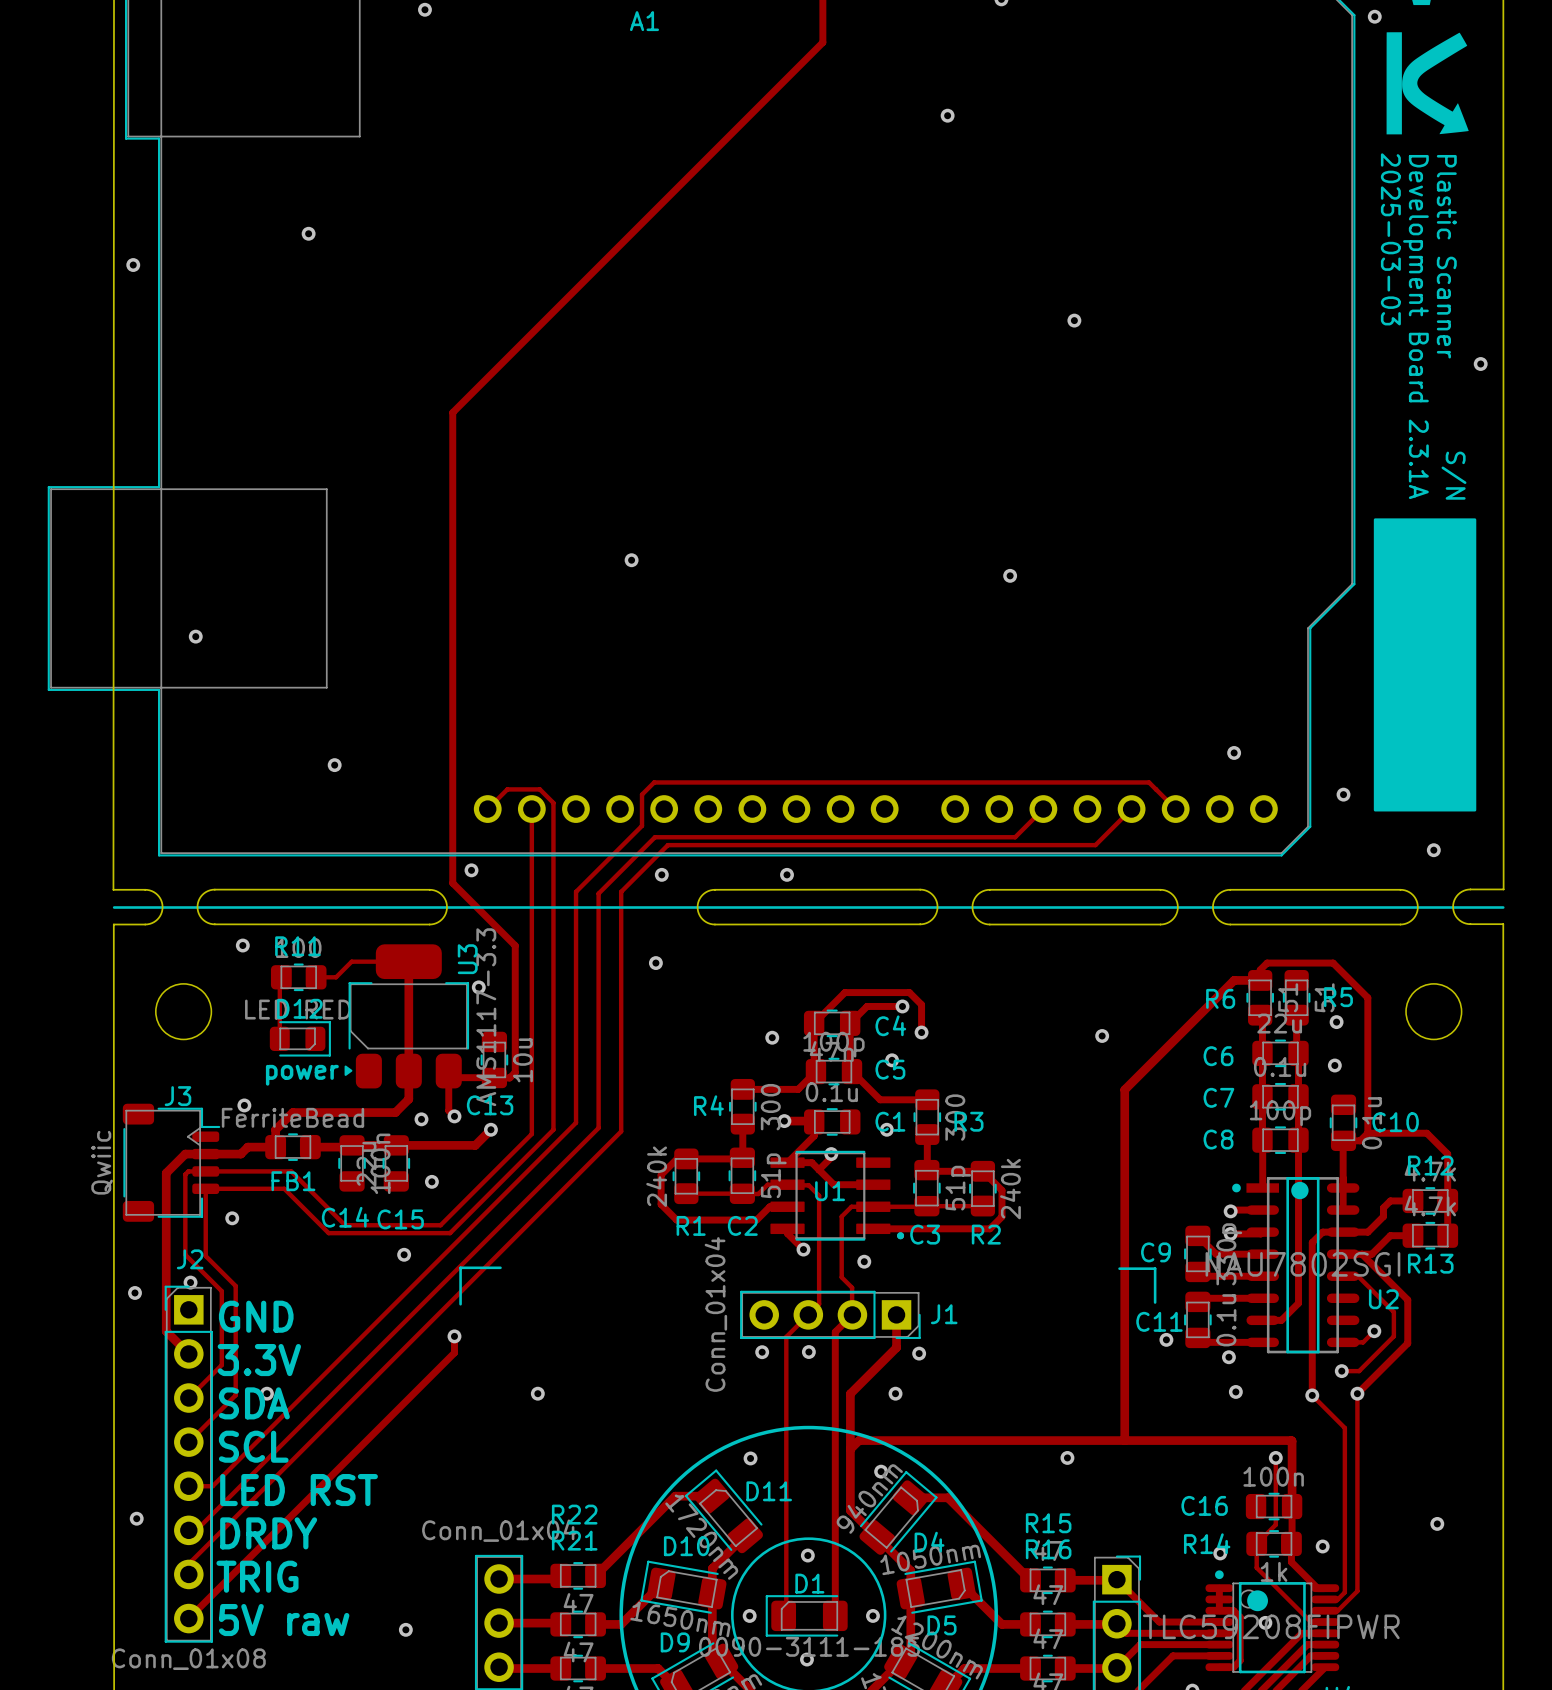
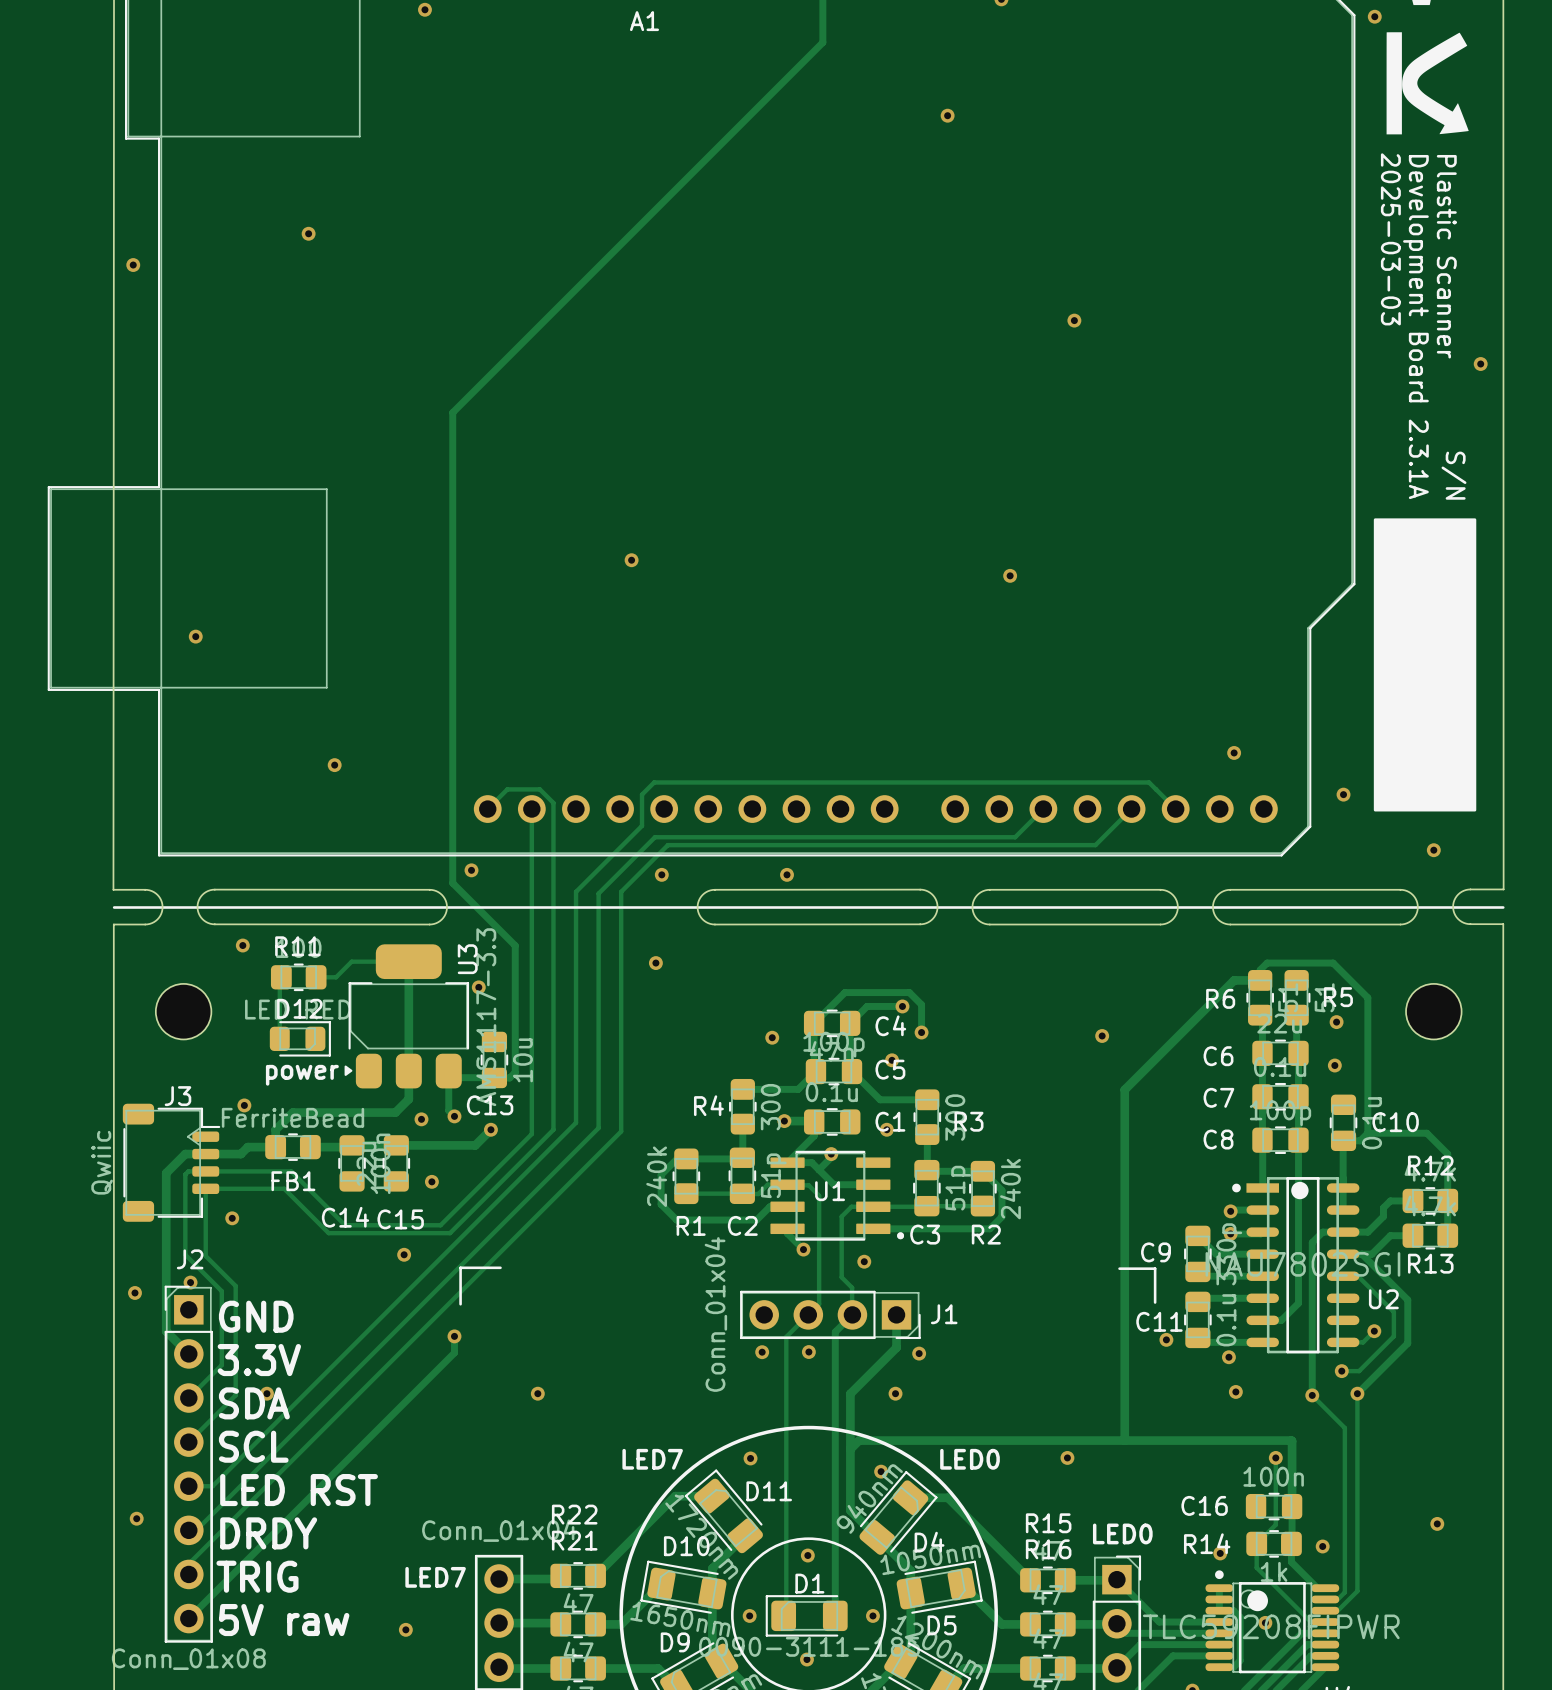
text: none -> LED7 (652, 1459)
text: none -> LED0 (970, 1459)
text: none -> LED0 (1122, 1533)
text: none -> LED7 (435, 1577)

